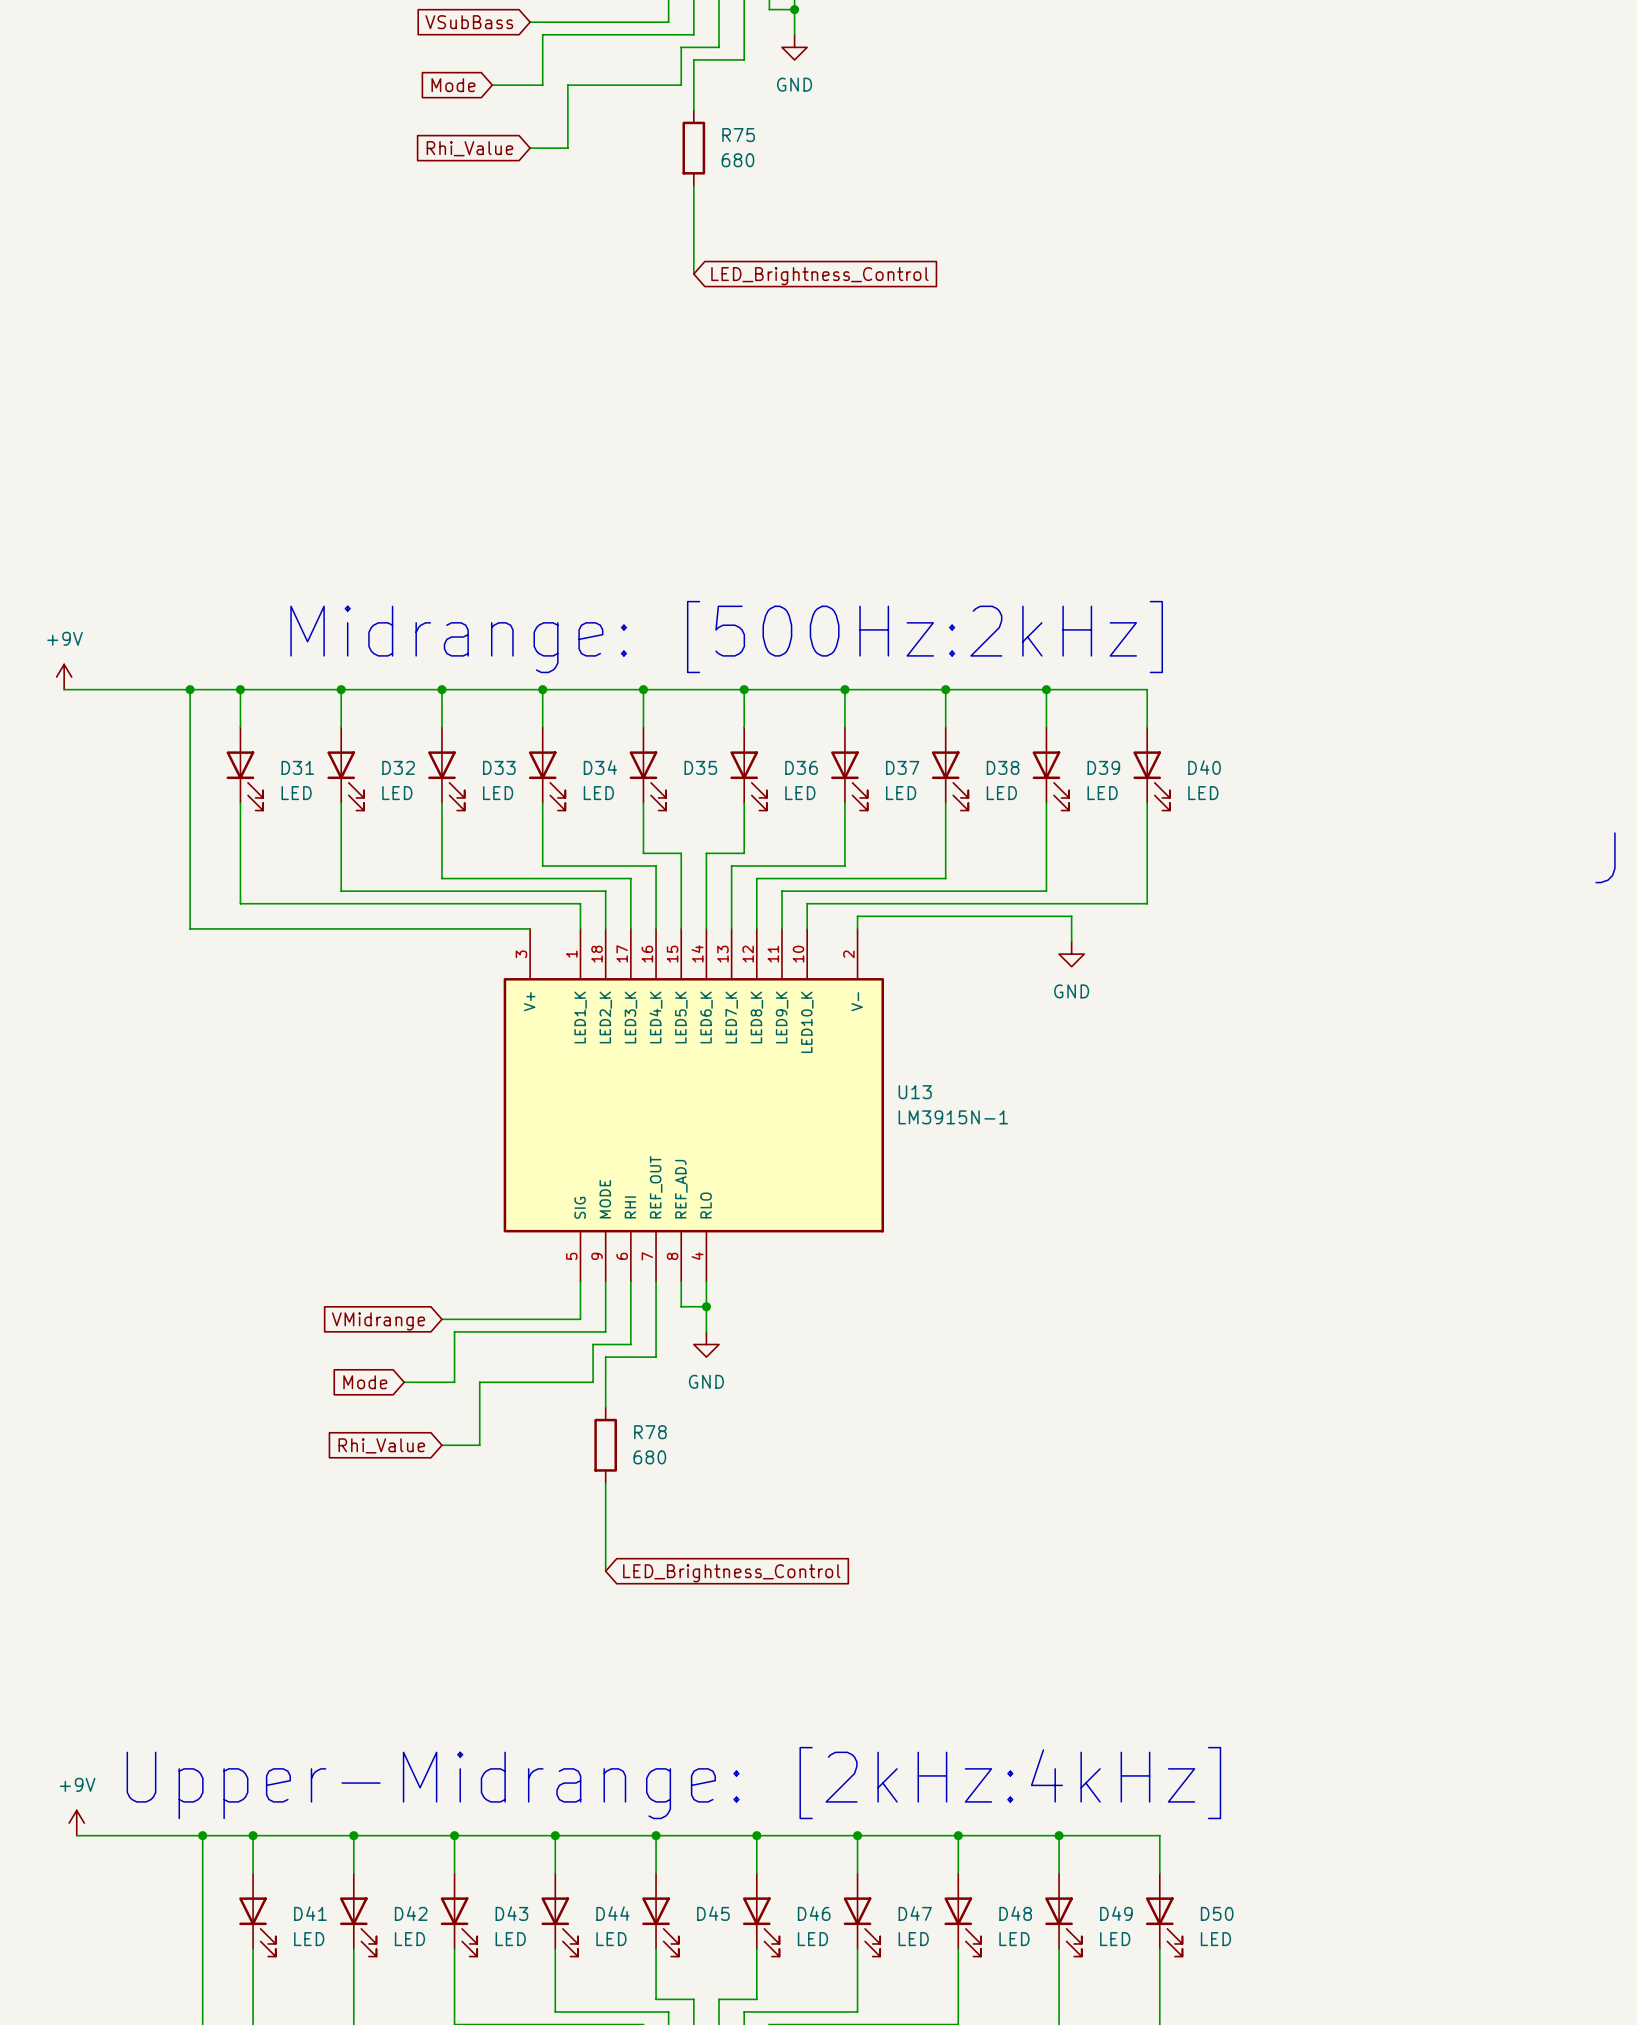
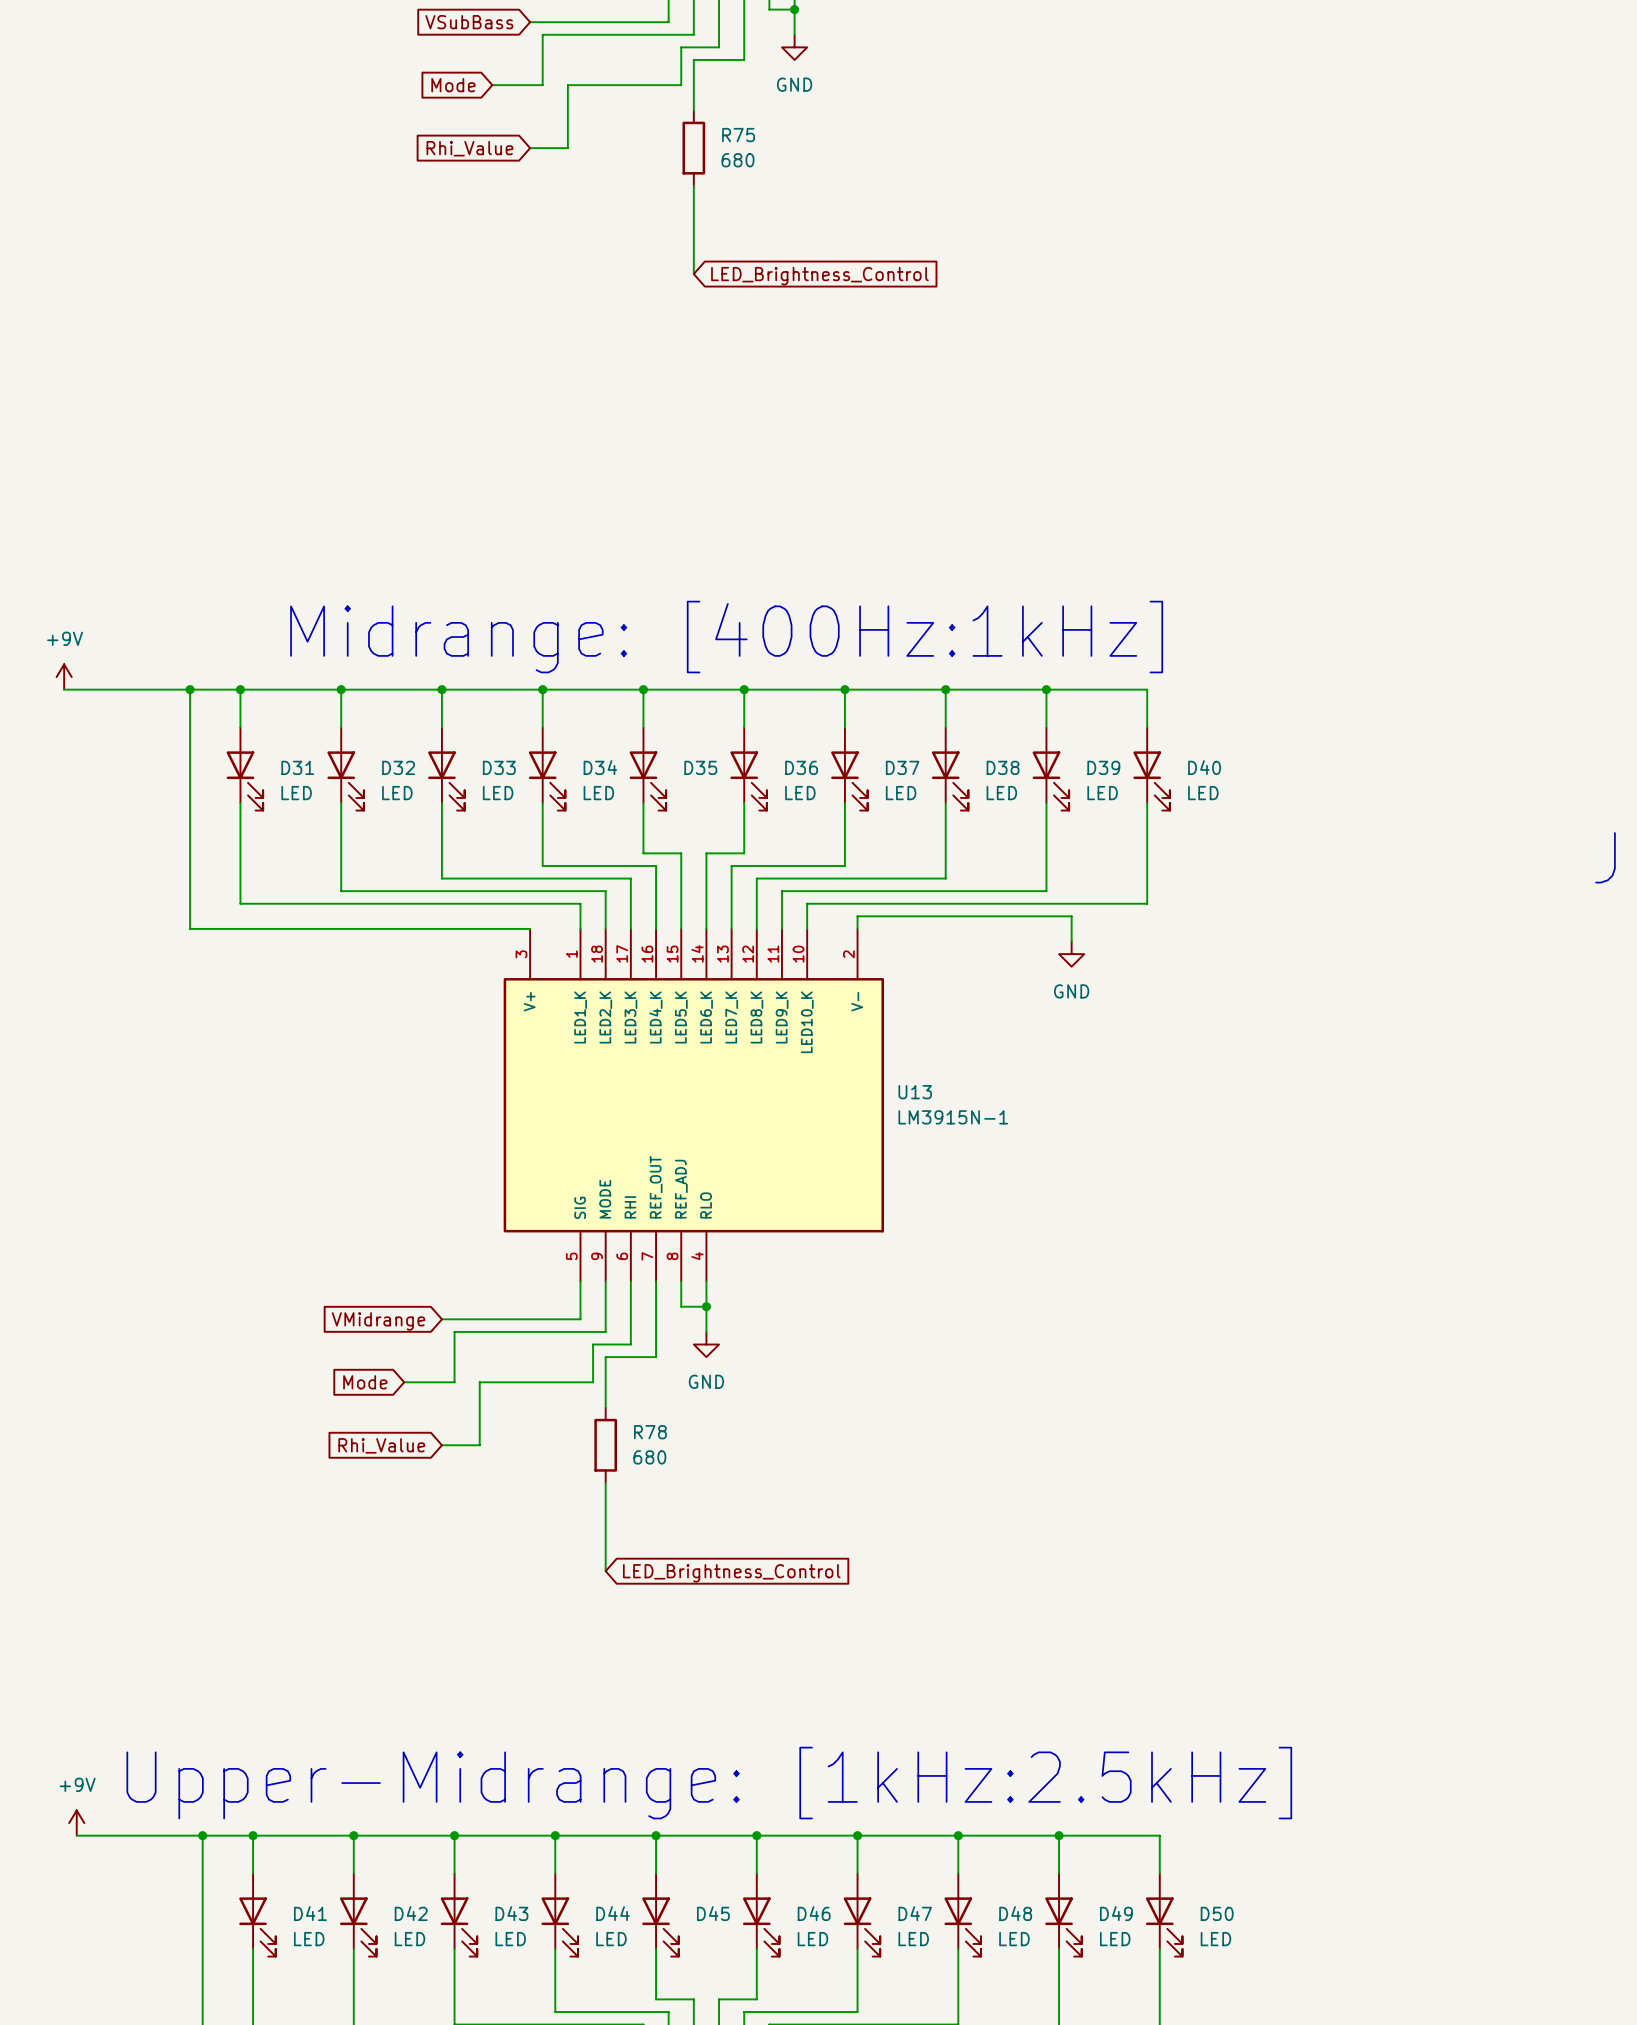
text: Midrange: [500Hz:2kHz] (726, 637) -> Midrange: [400Hz:1kHz] (726, 637)
text: Upper-Midrange: [2kHz:4kHz] (673, 1783) -> Upper-Midrange: [1kHz:2.5kHz] (709, 1783)

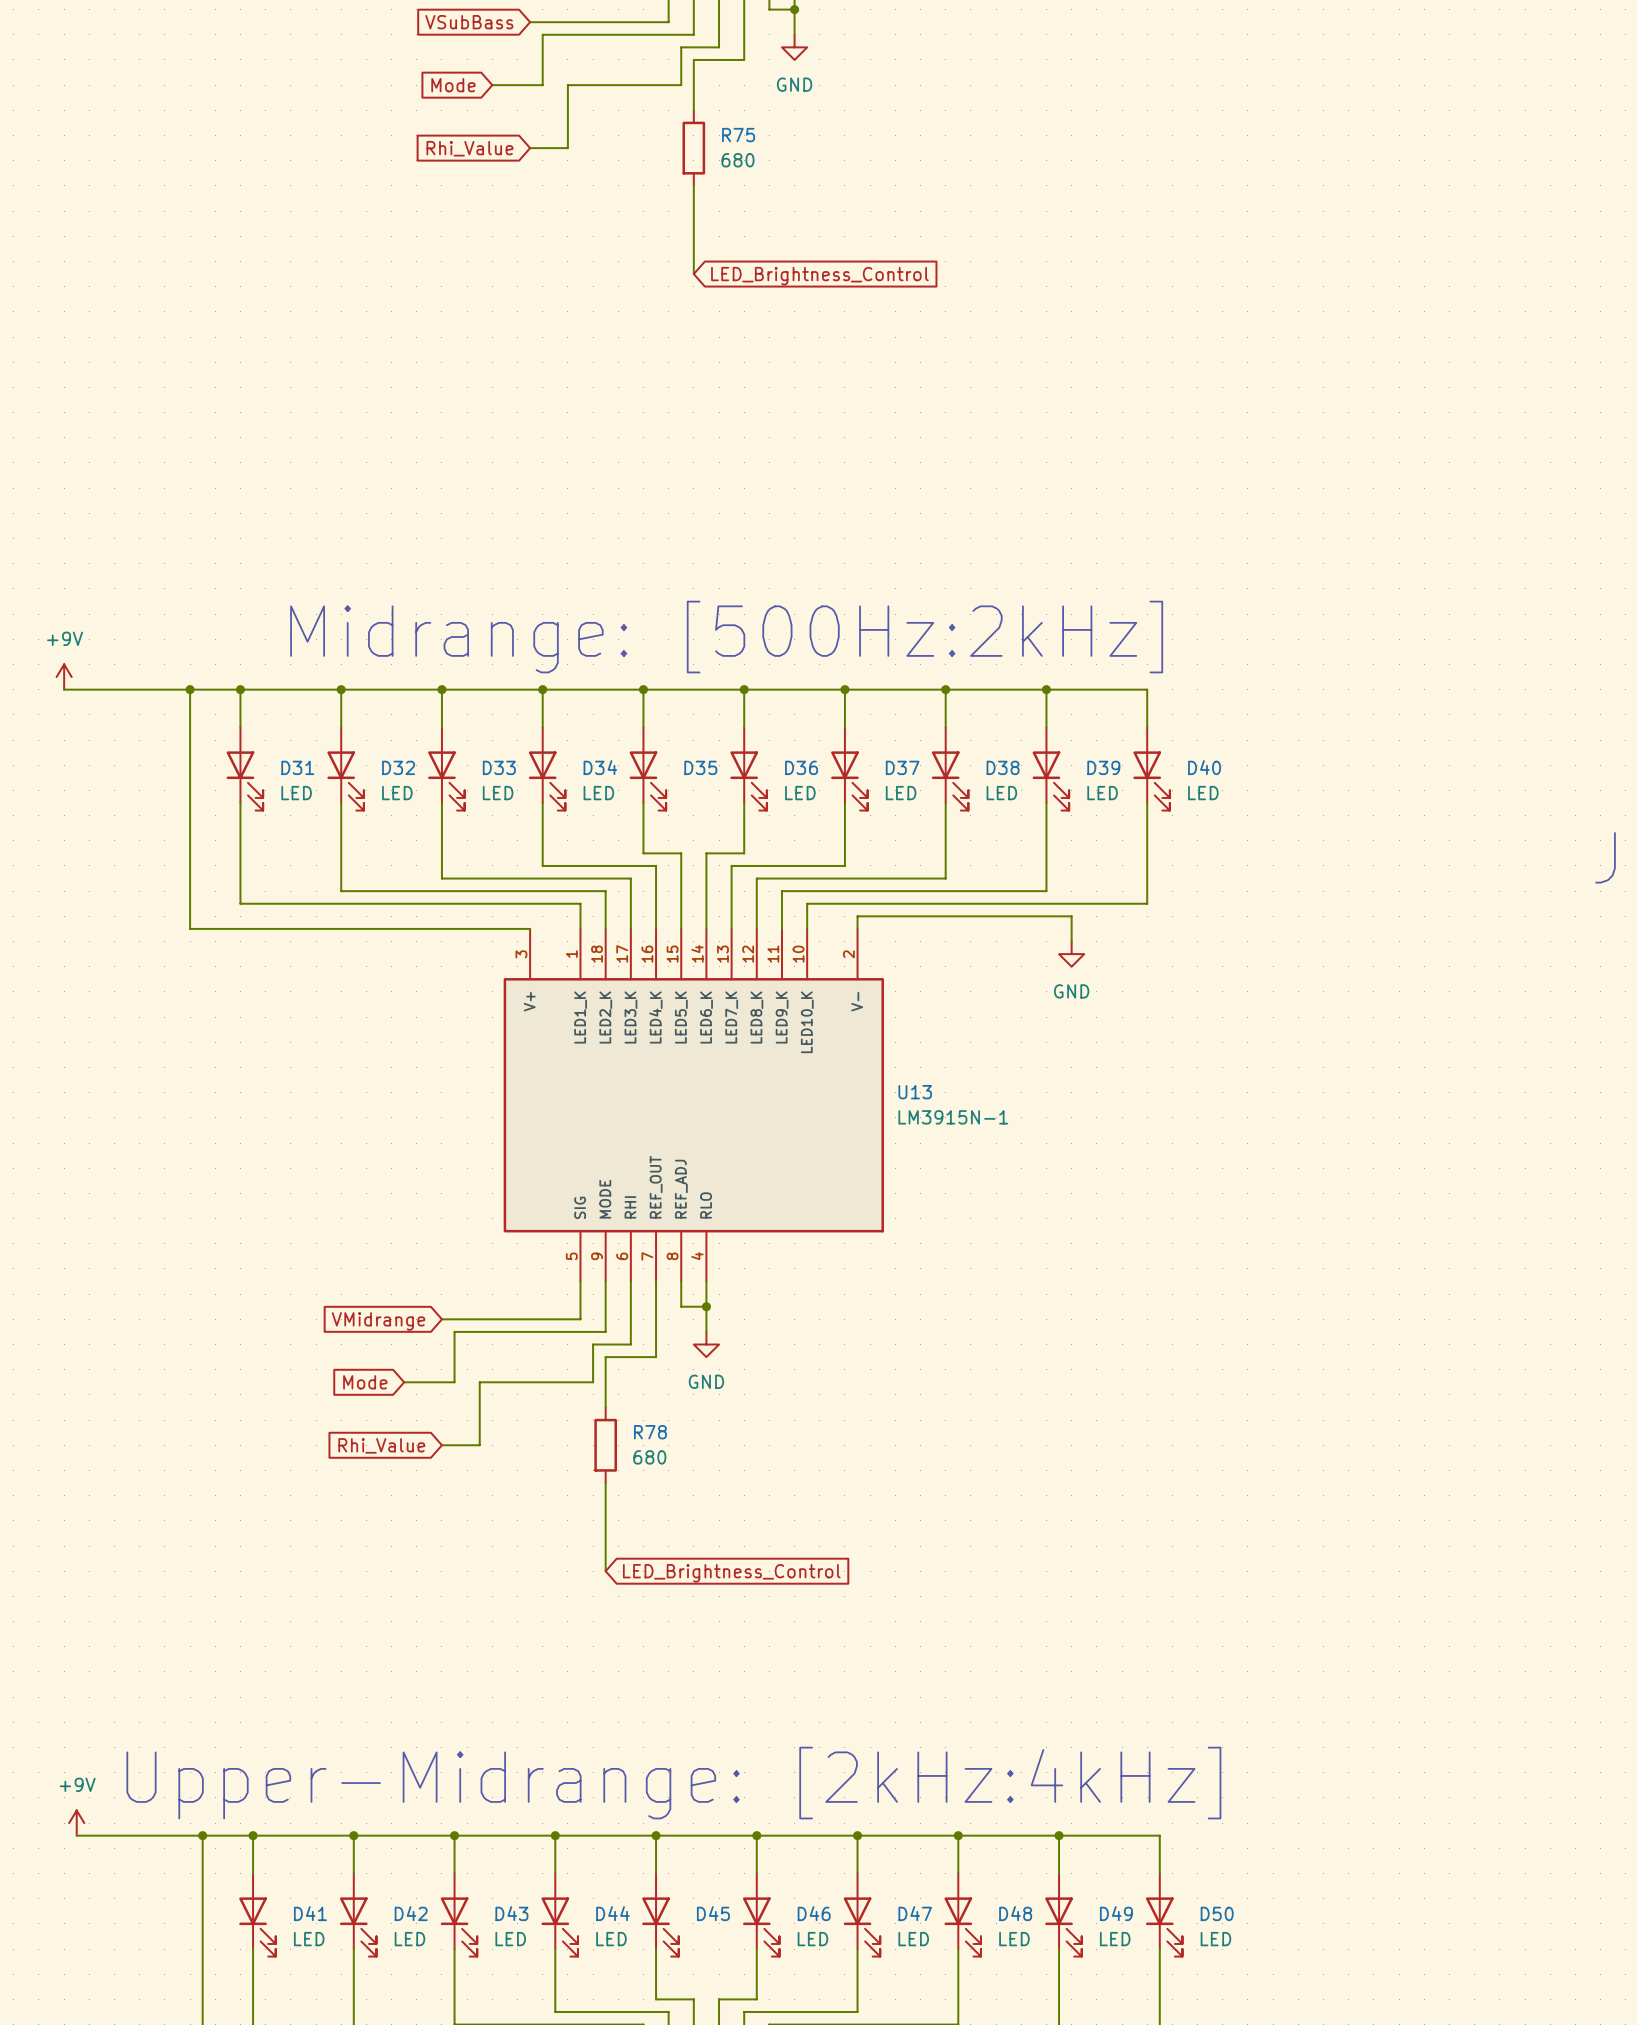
text: Midrange: [400Hz:1kHz] (726, 637) -> Midrange: [500Hz:2kHz] (726, 637)
text: Upper-Midrange: [1kHz:2.5kHz] (709, 1783) -> Upper-Midrange: [2kHz:4kHz] (673, 1783)

